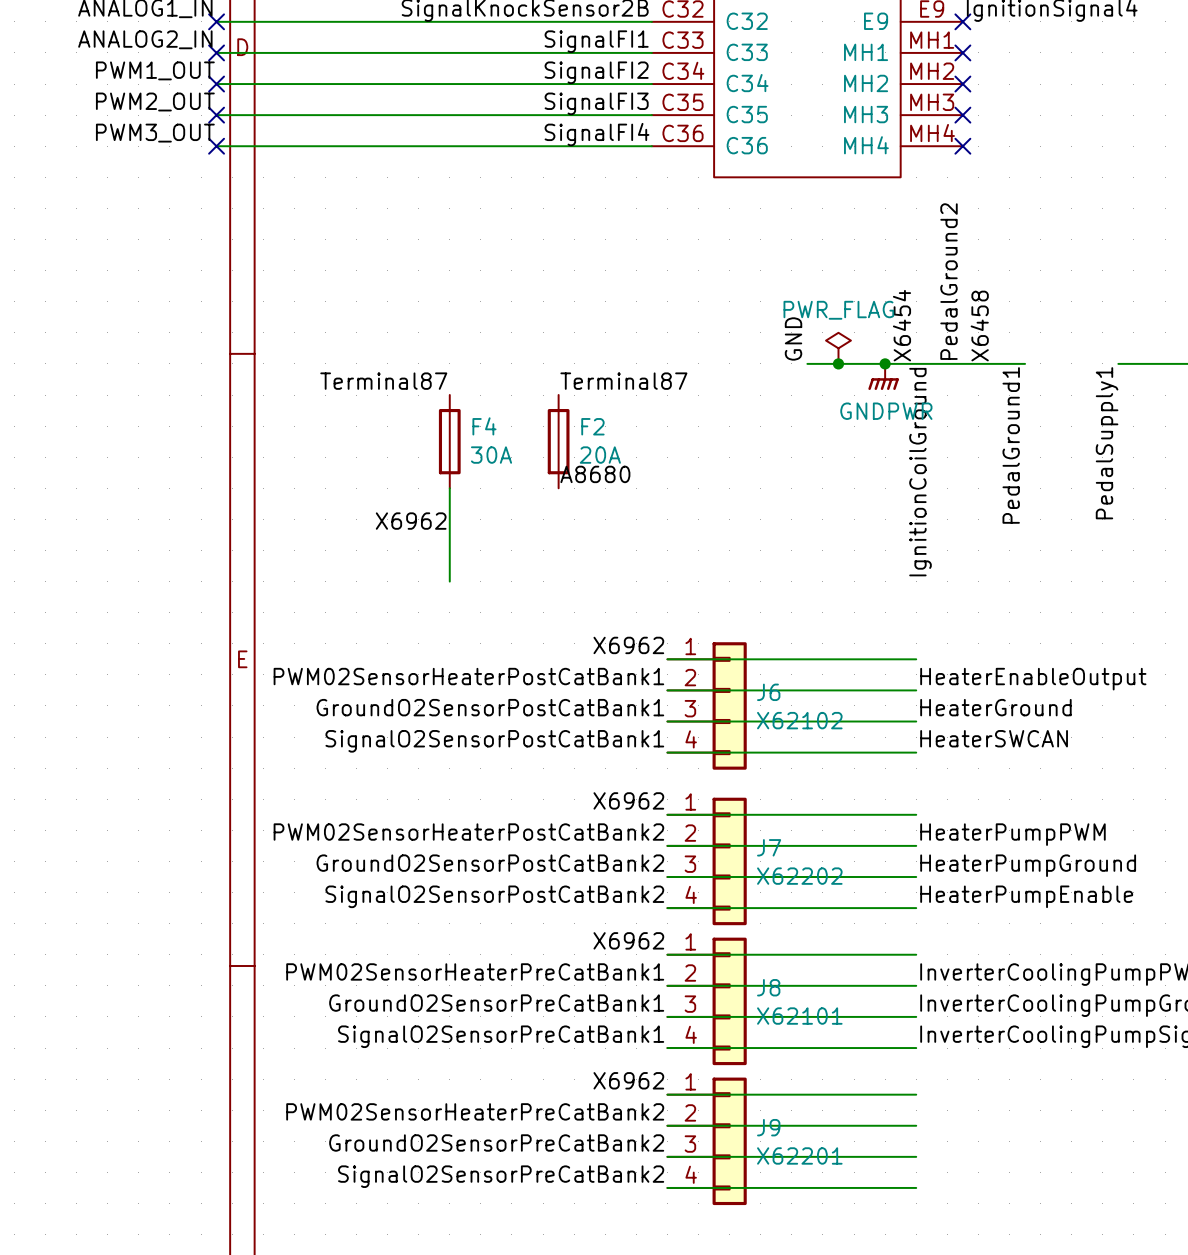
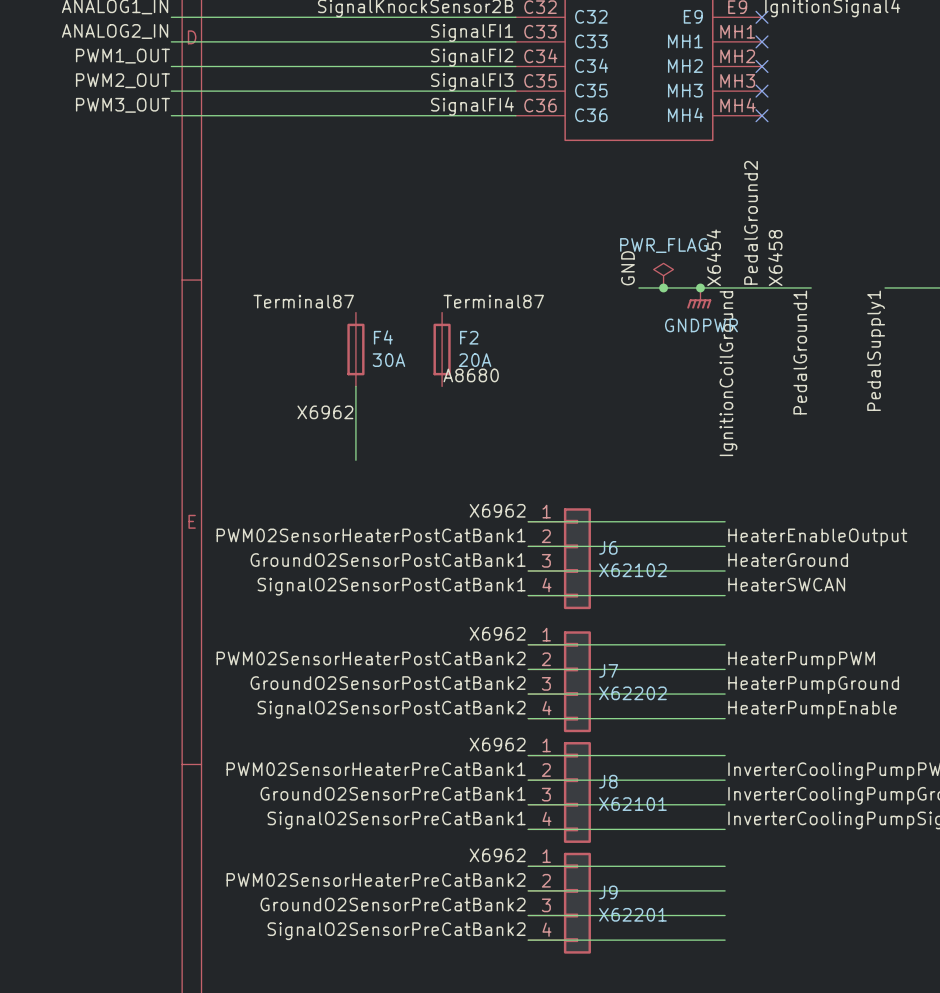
no-connect mark: (216, 21) -> none
no-connect mark: (216, 52) -> none
no-connect mark: (216, 84) -> none
no-connect mark: (216, 115) -> none
no-connect mark: (216, 146) -> none

